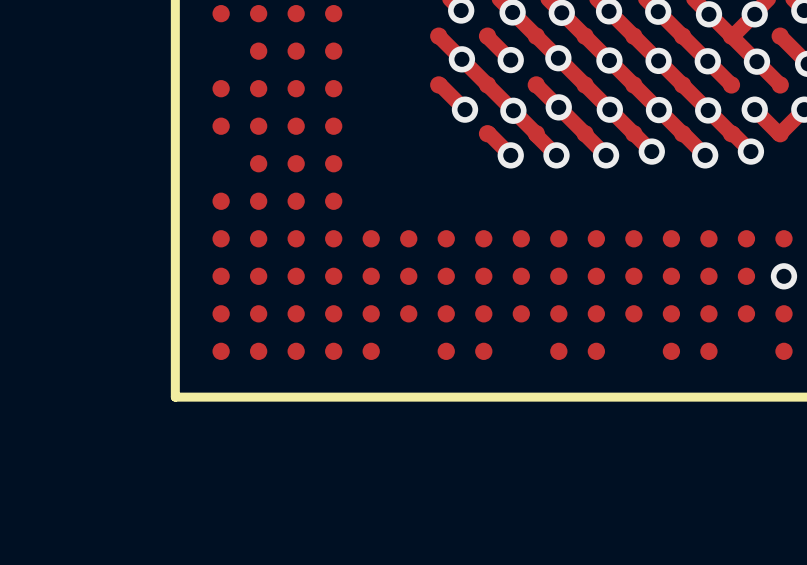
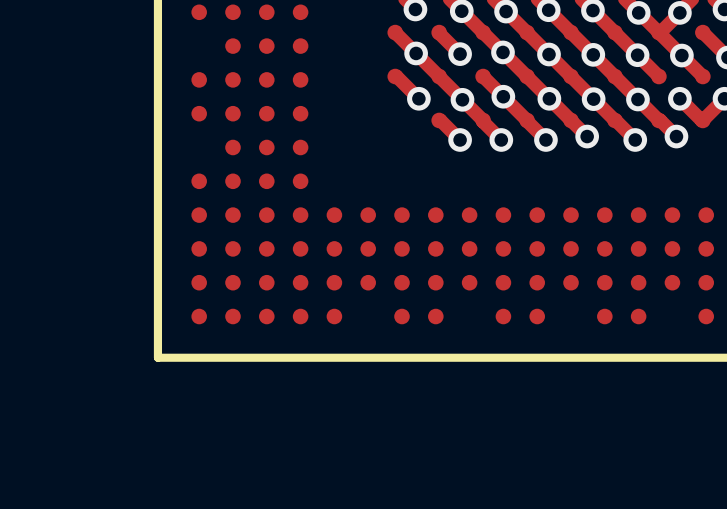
via: (783, 276) -> none

